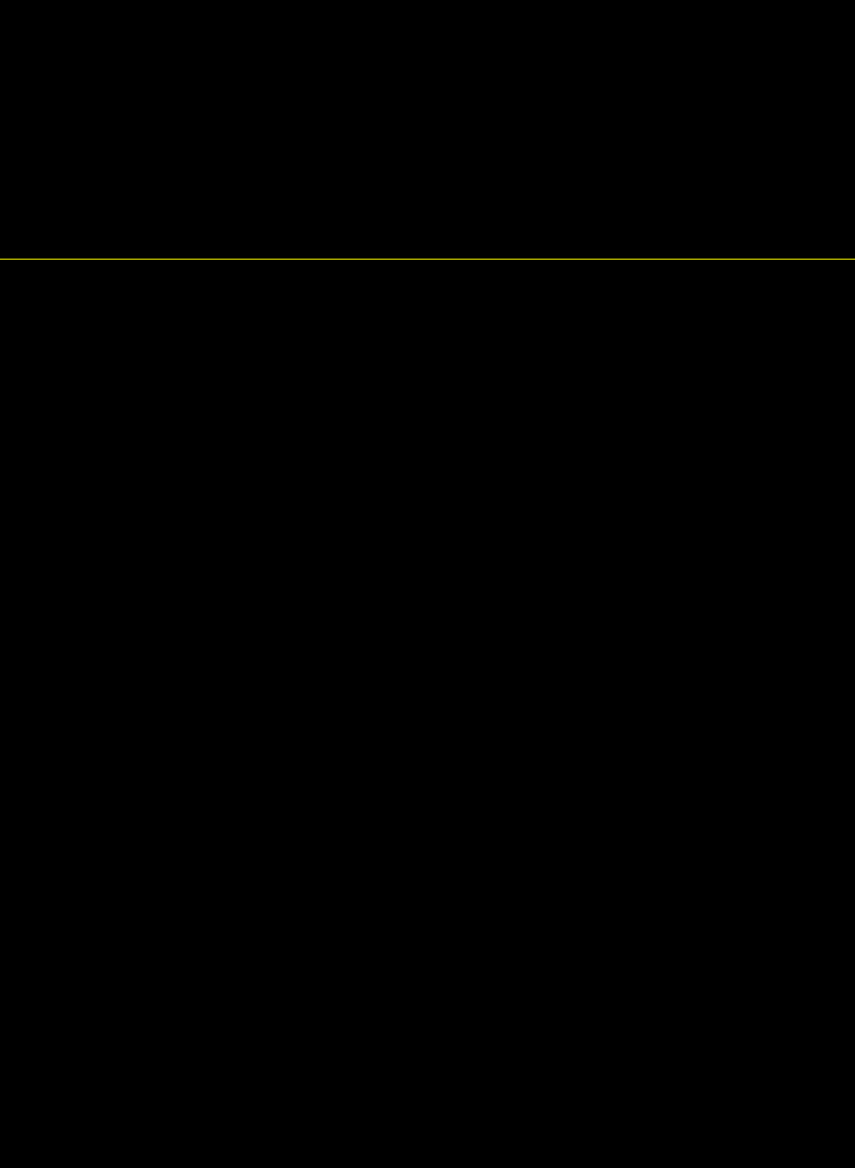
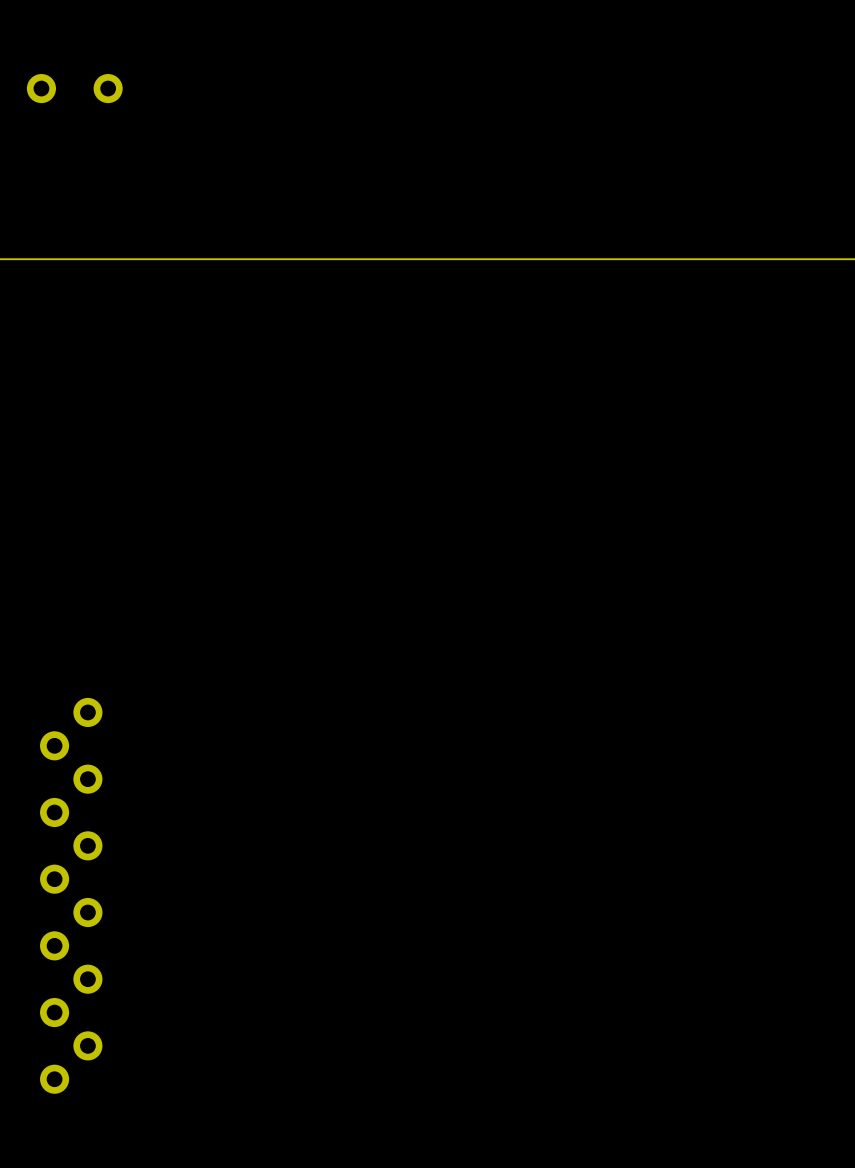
part: none -> (74, 88)
part: none -> (71, 895)

